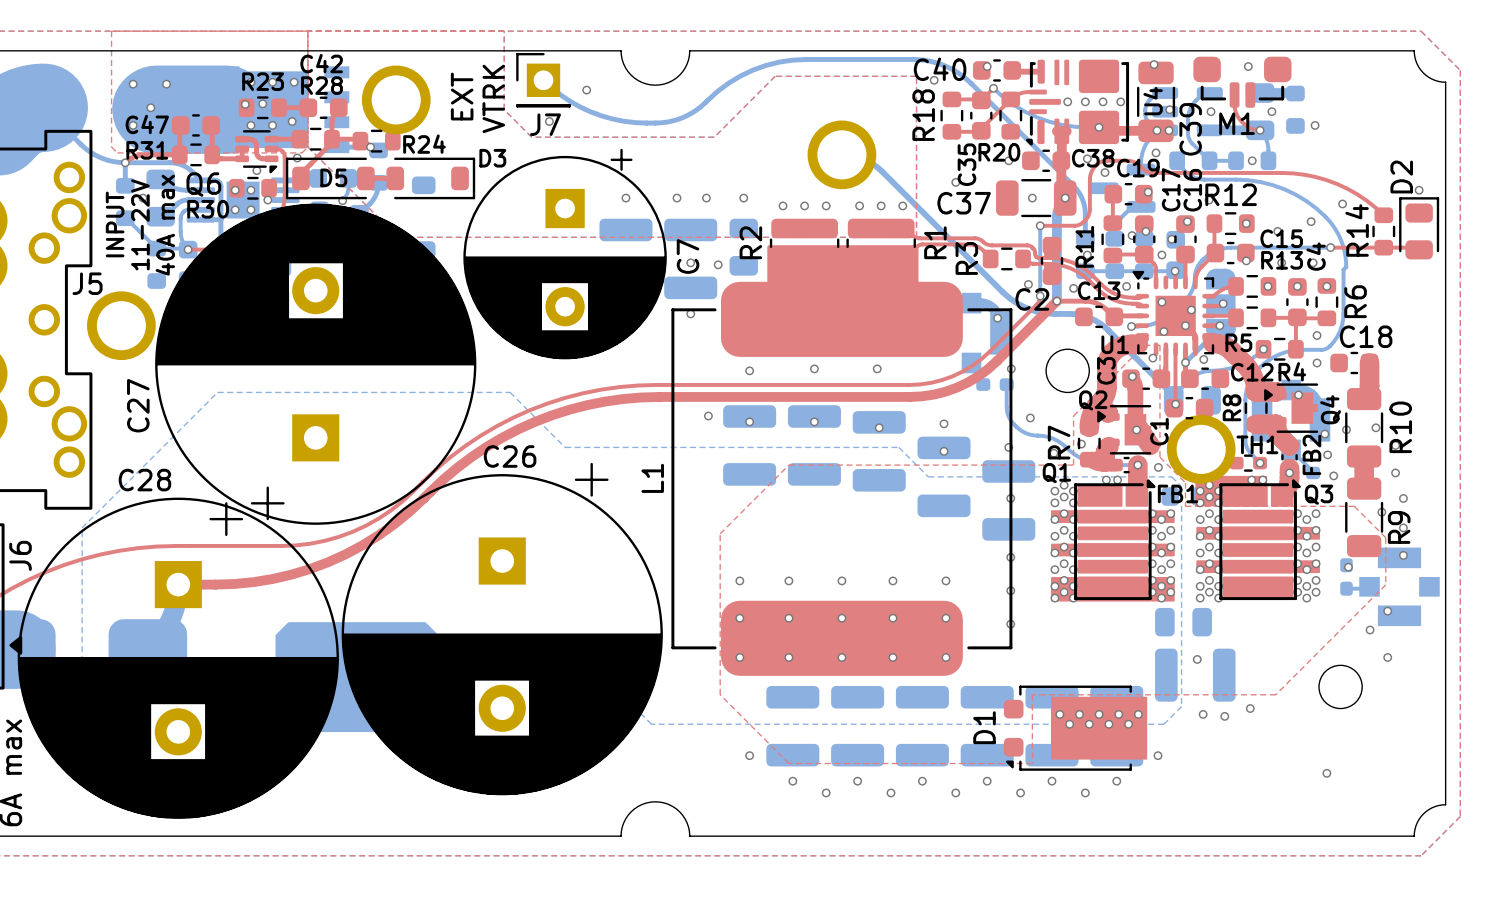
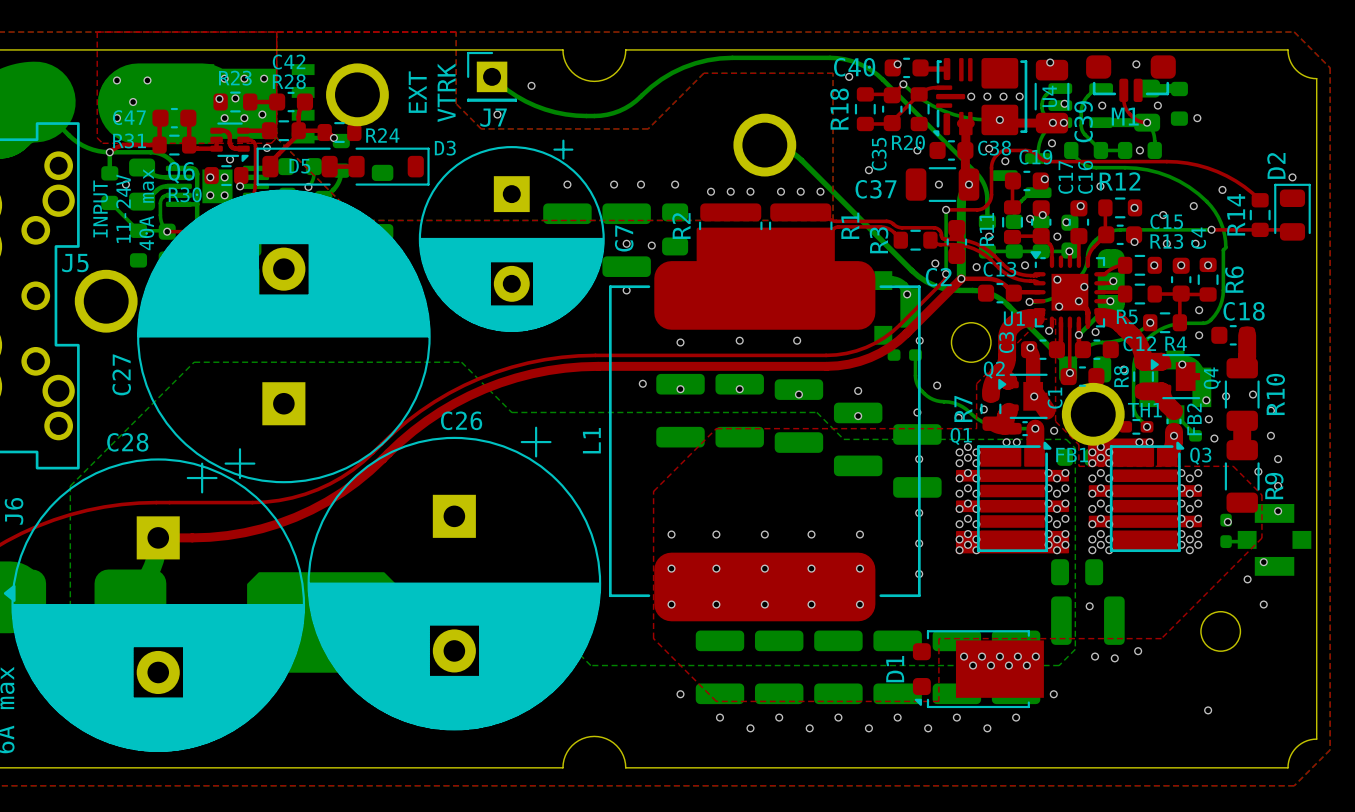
text: 11-22V (140, 224) -> 11-24V (123, 208)

